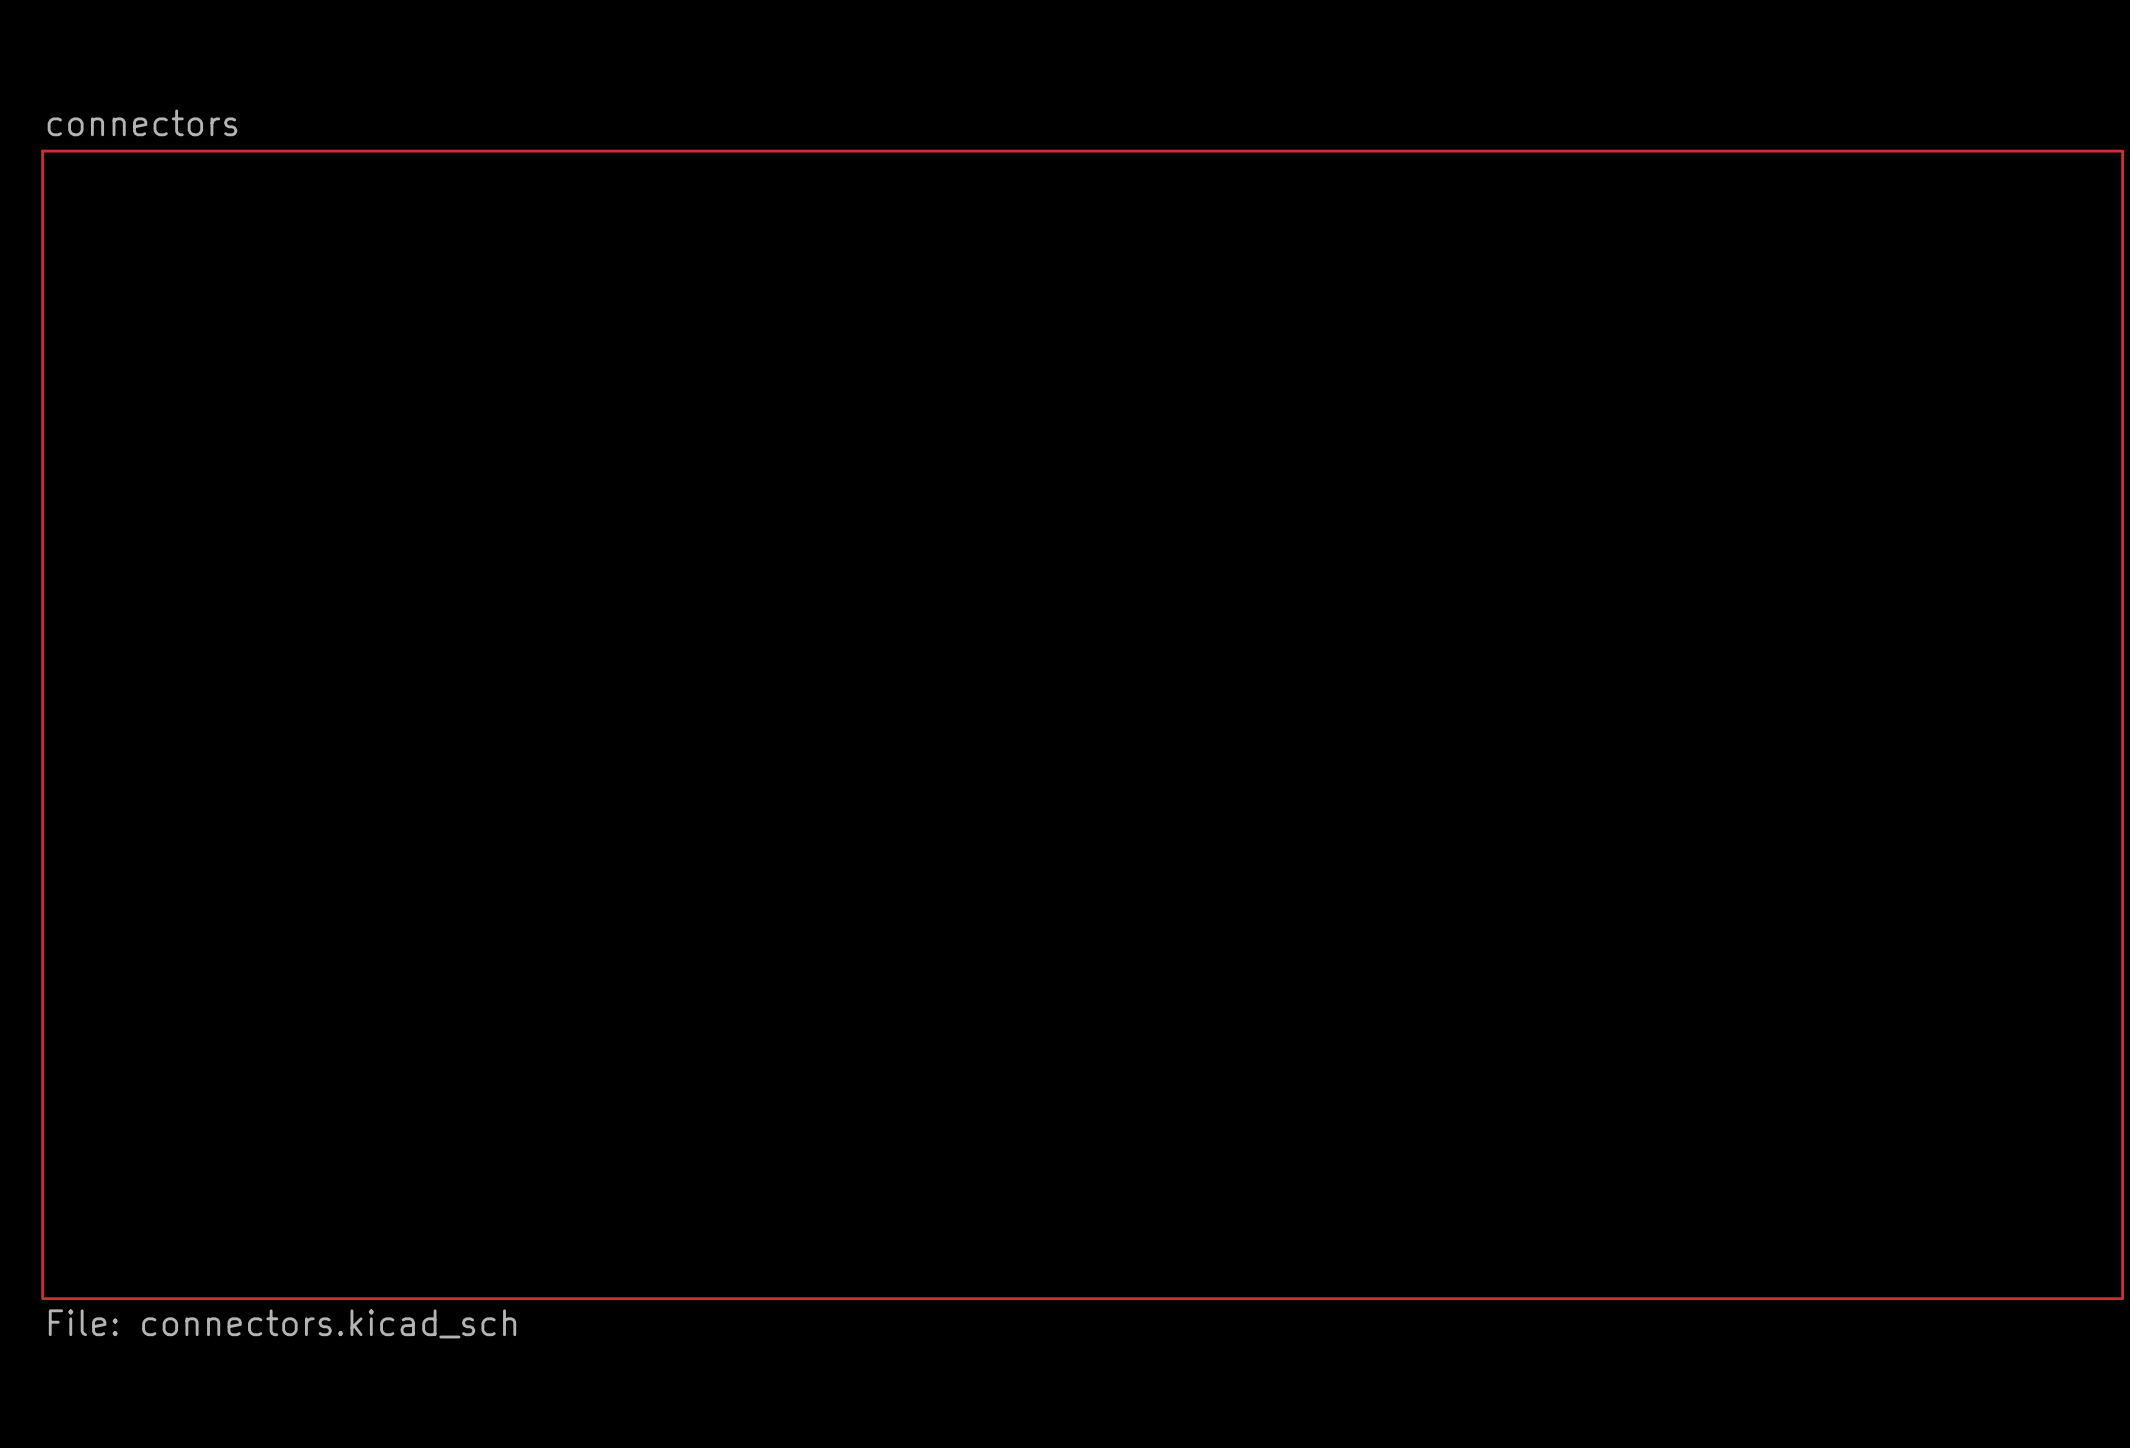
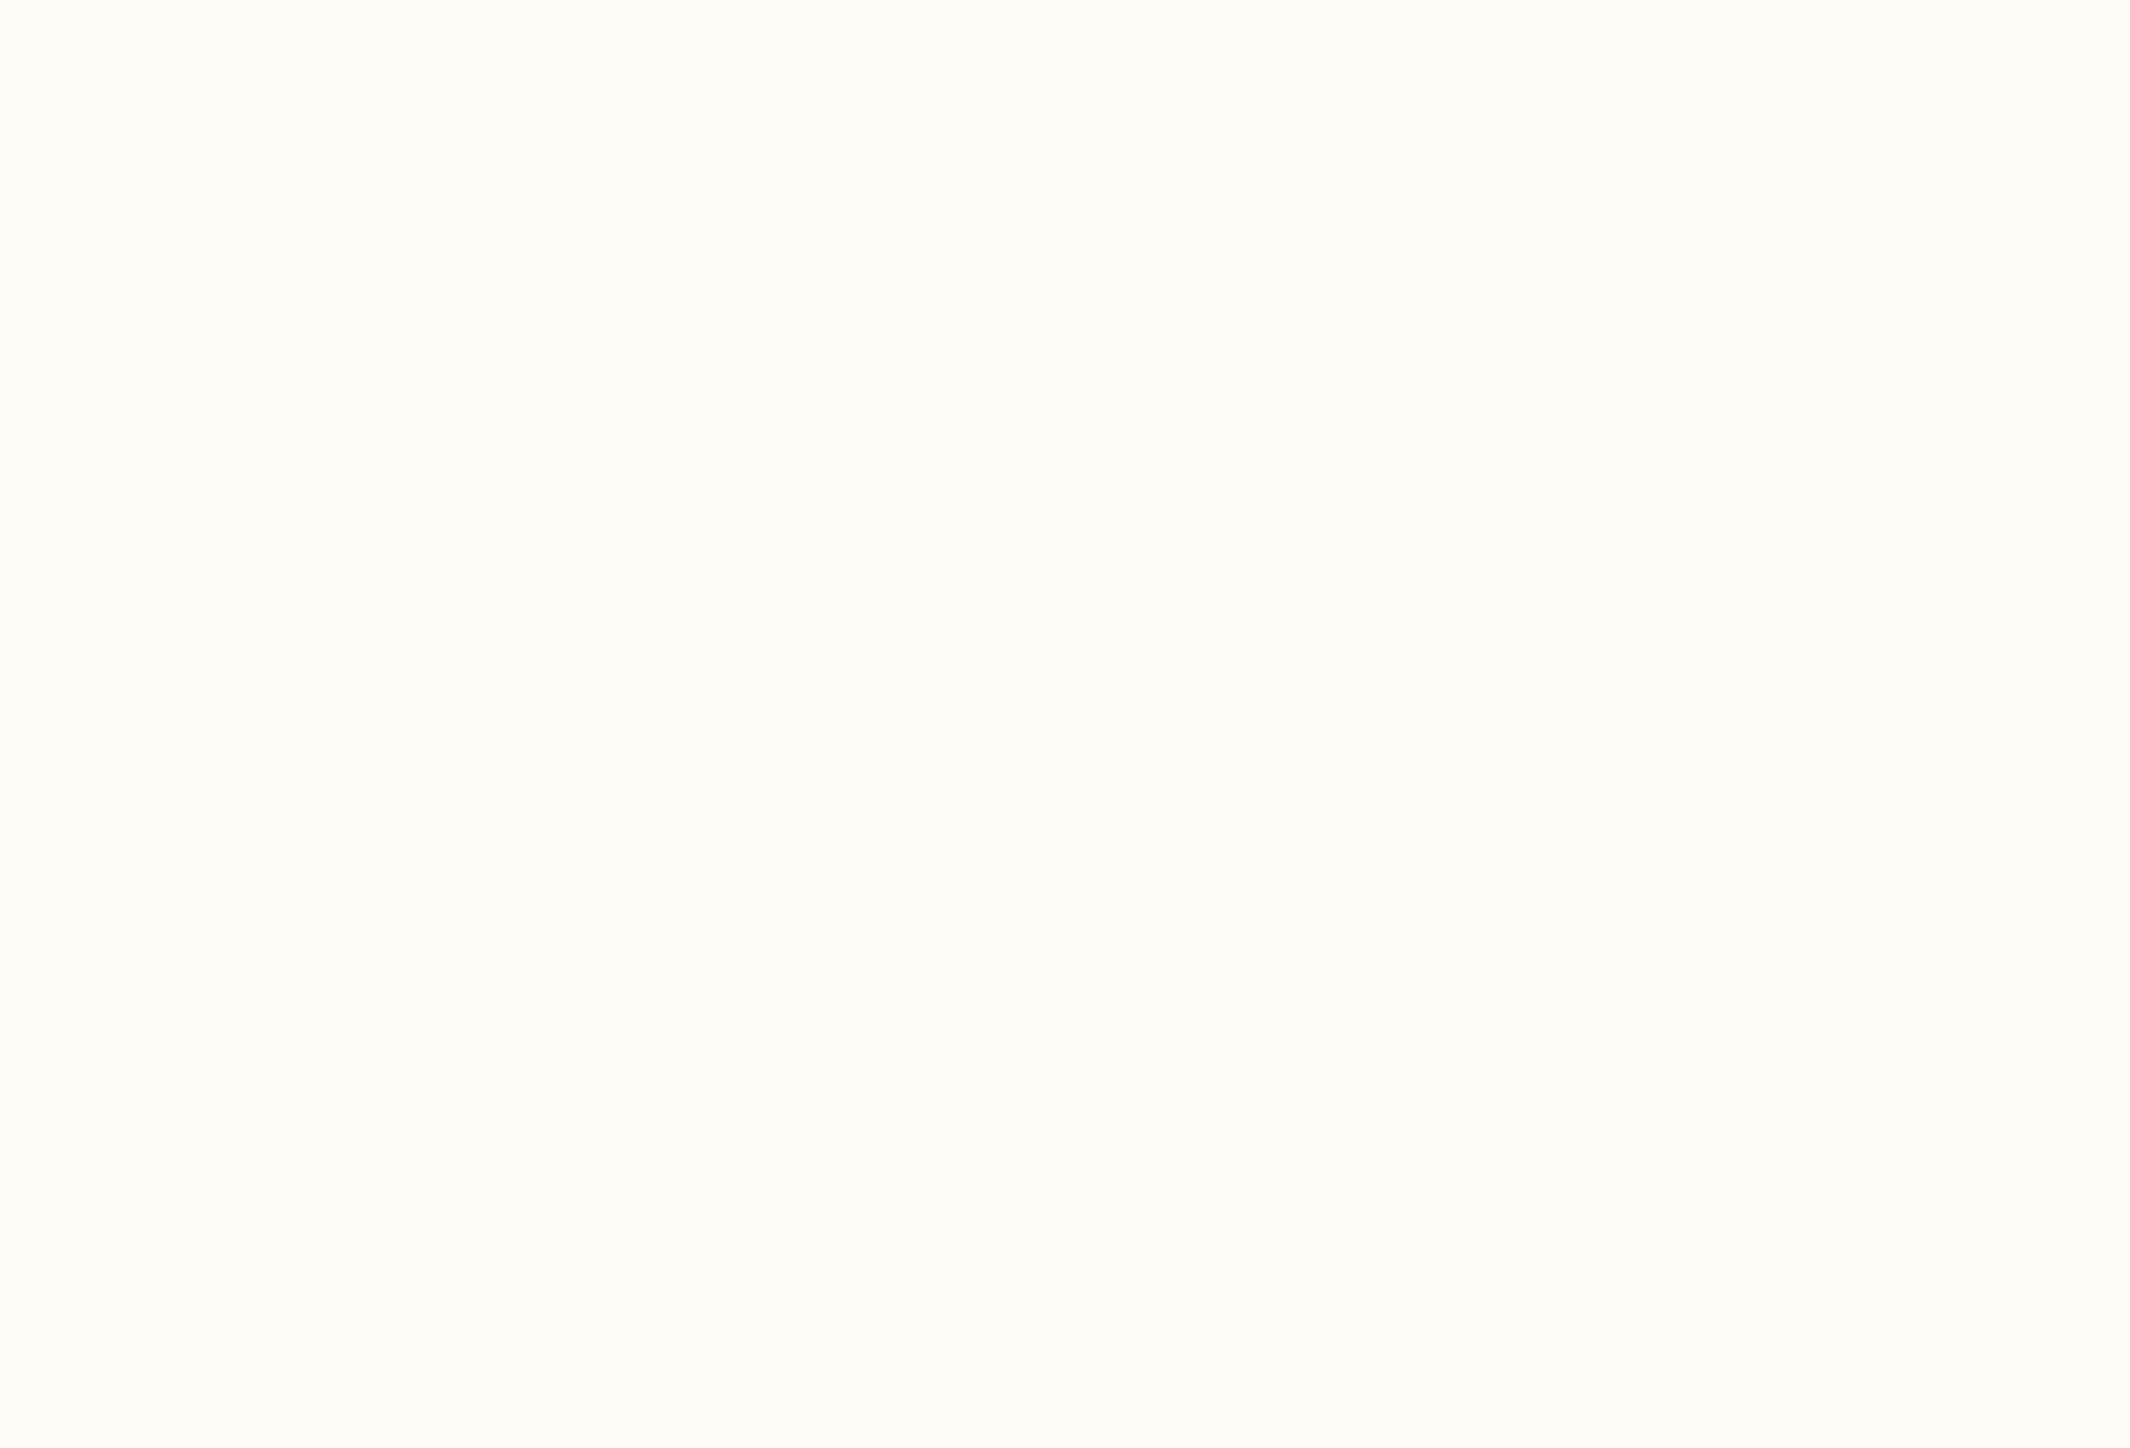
sheet connectors: File: connectors.kicad_sch (1082, 724) -> none

